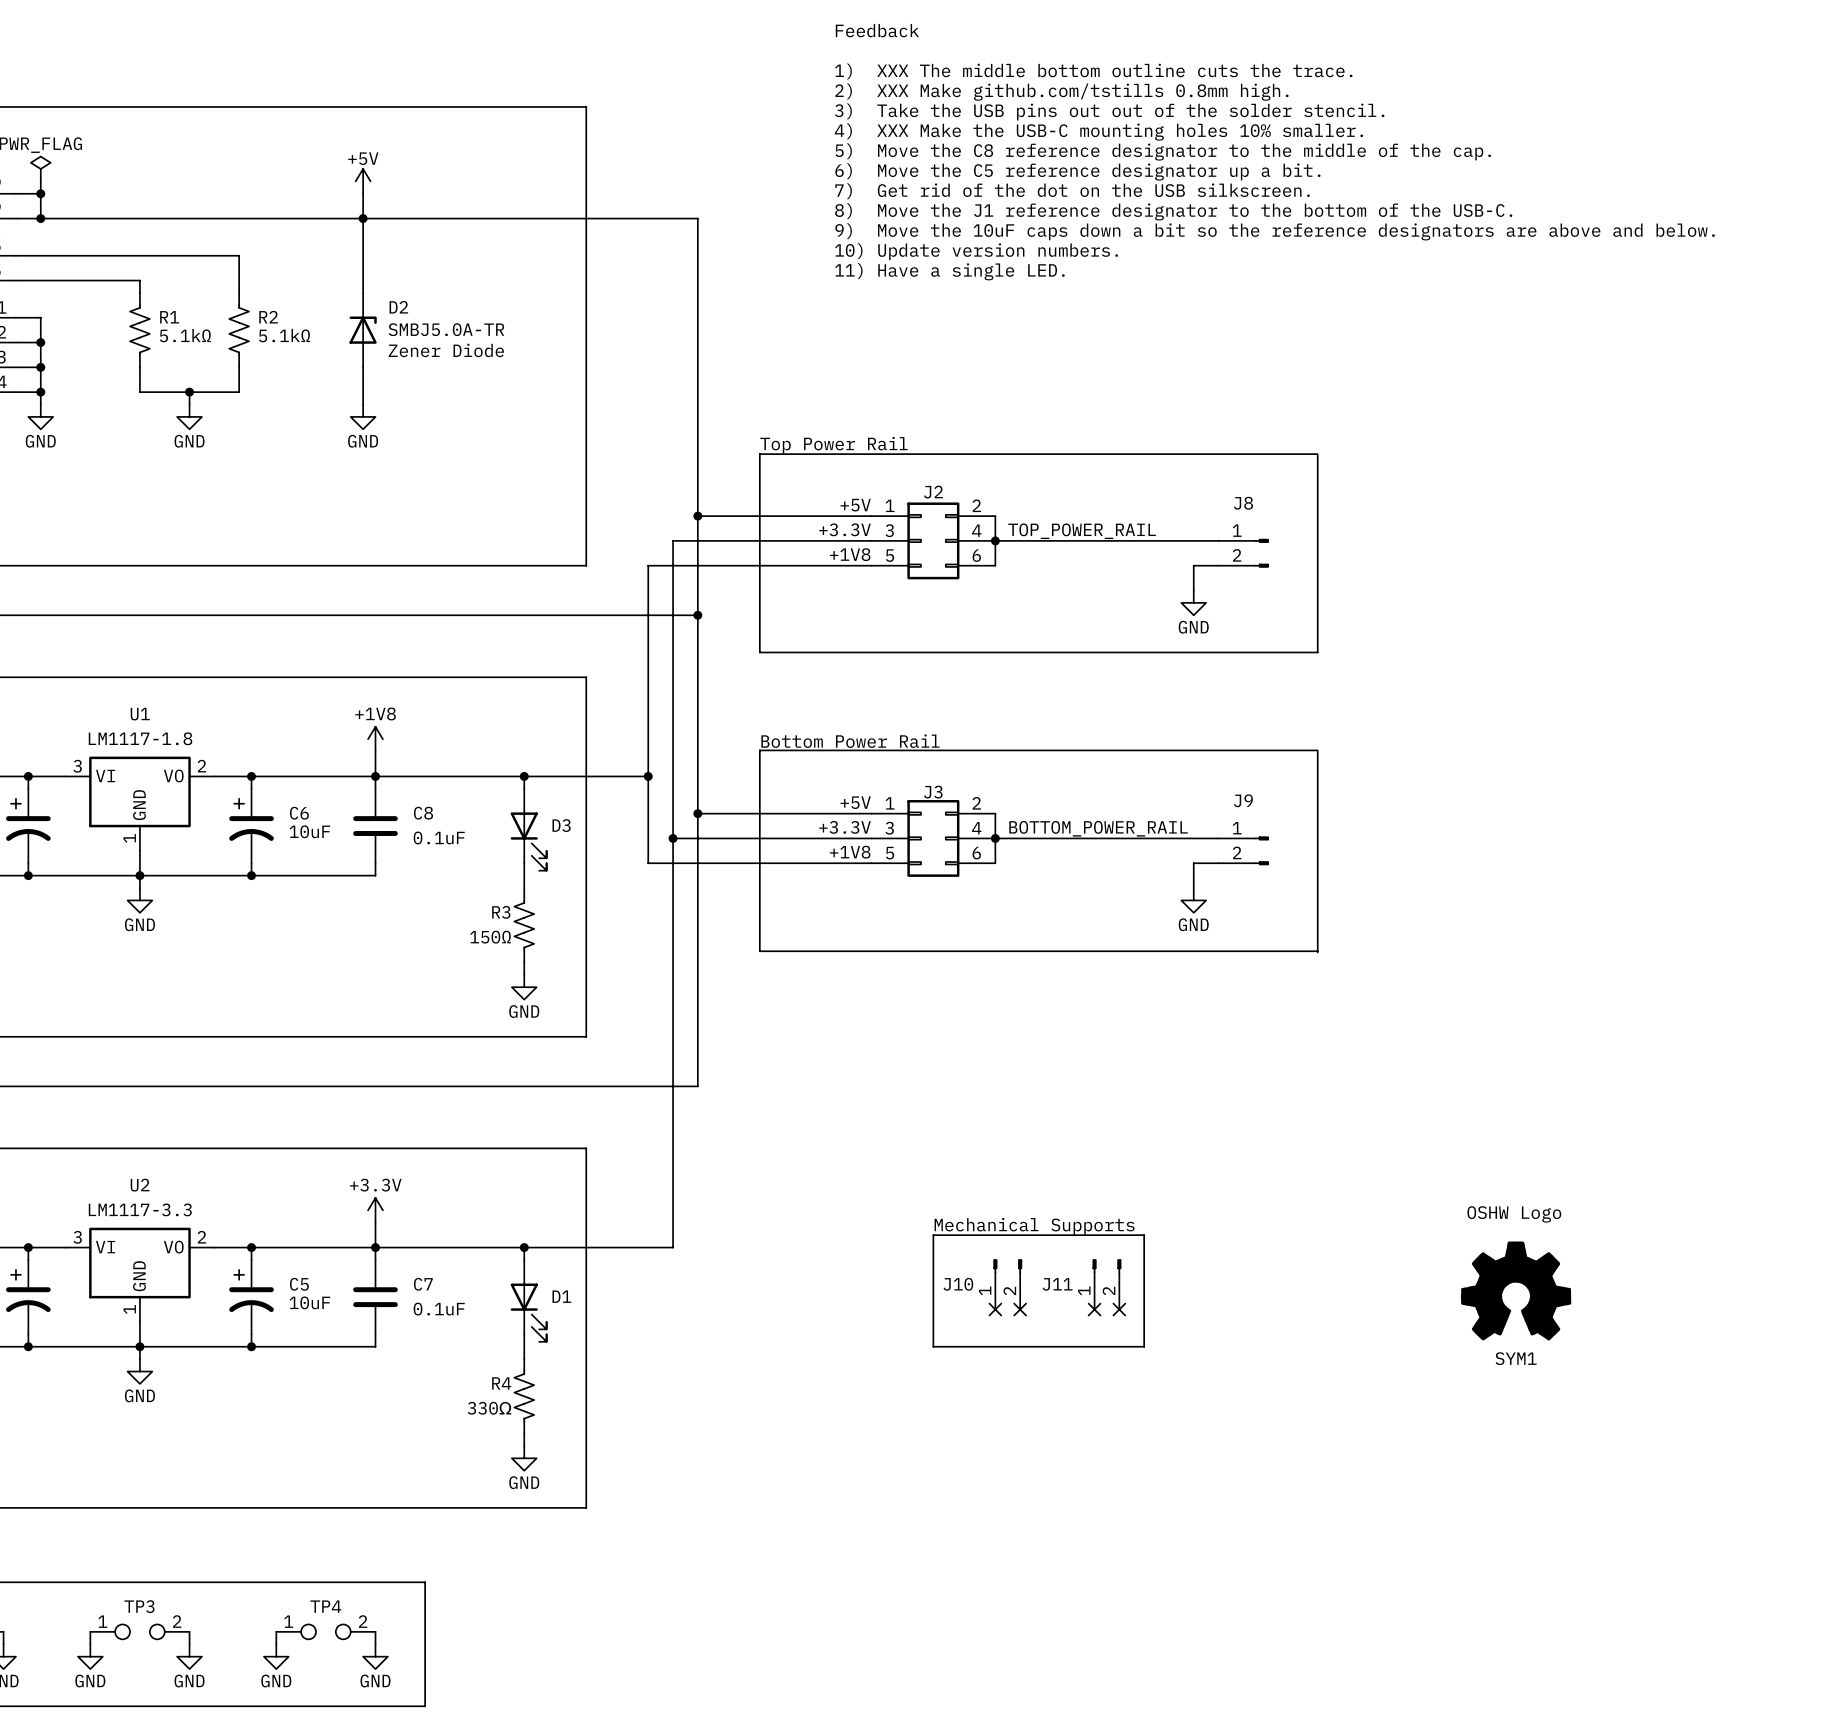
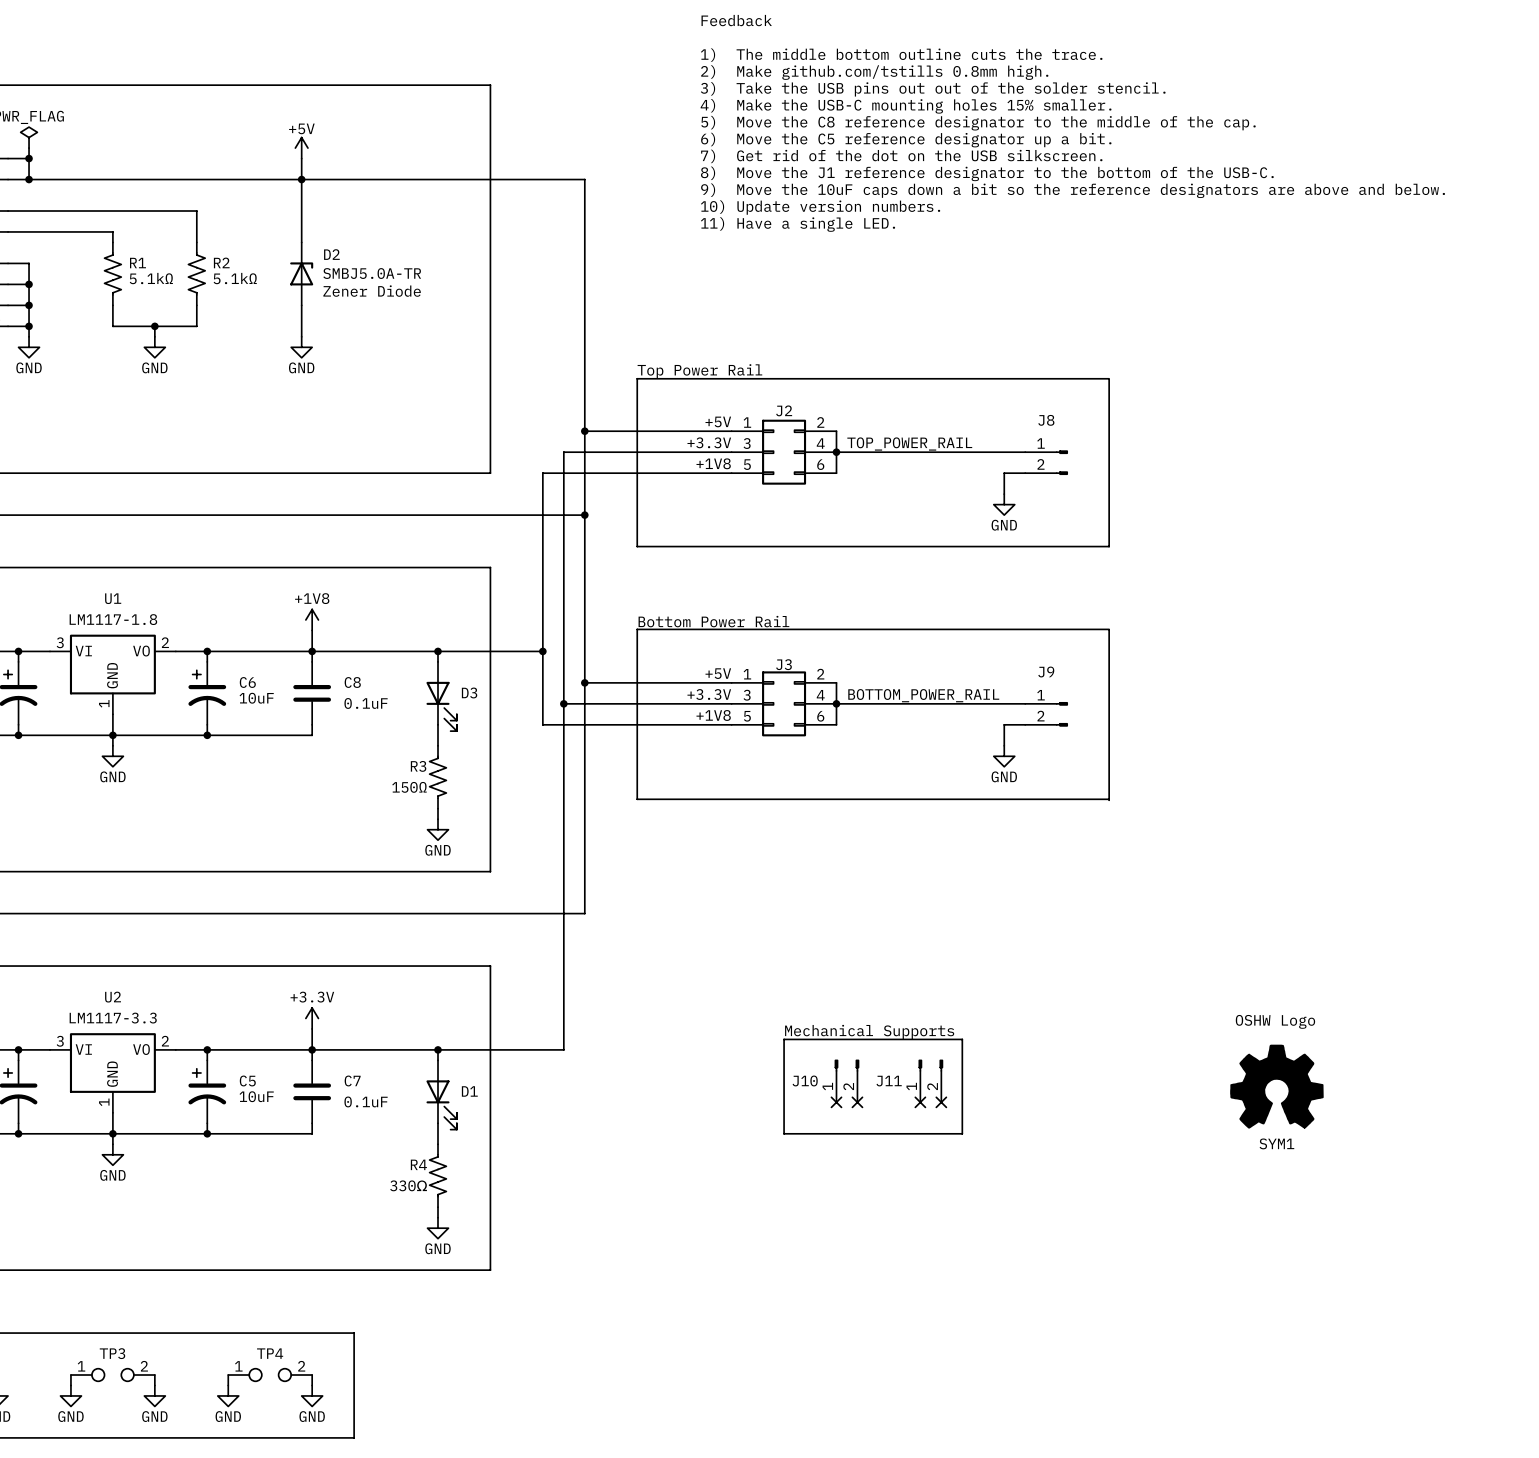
text: 1) XXX The middle bottom outline cuts the trace. (1093, 71) -> 1) The middle bottom outline cuts the trace. (901, 55)
text: 2) XXX Make github.com/tstills 0.8mm high. (1061, 92) -> 2) Make github.com/tstills 0.8mm high. (874, 72)
text: 4) XXX Make the USB-C mounting holes 10% smaller. (1098, 132) -> 4) Make the USB-C mounting holes 15% smaller. (906, 106)

